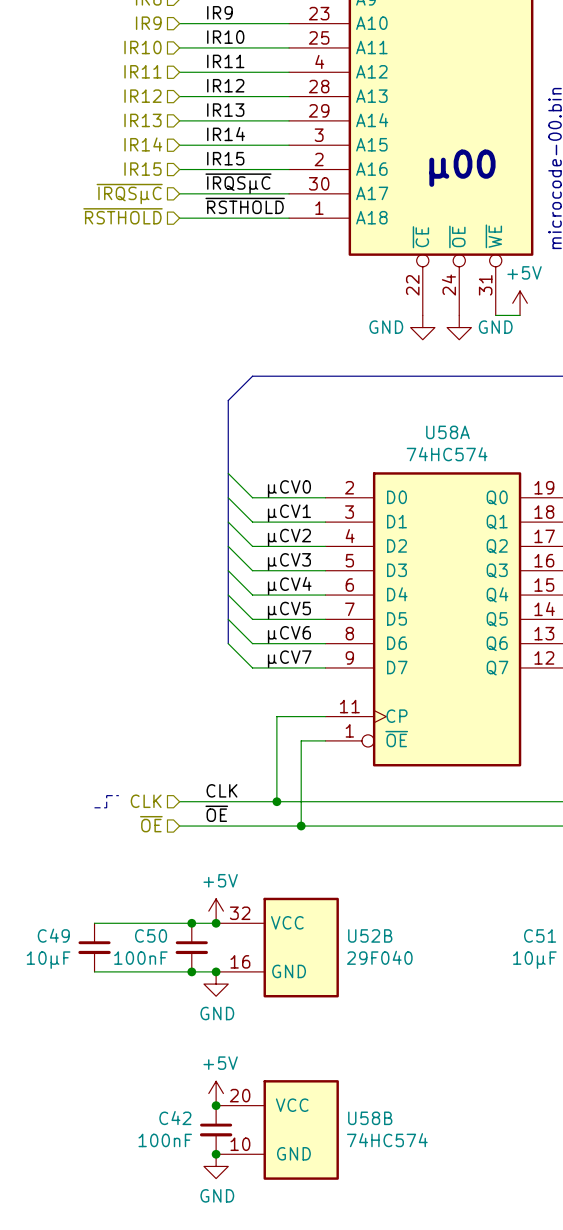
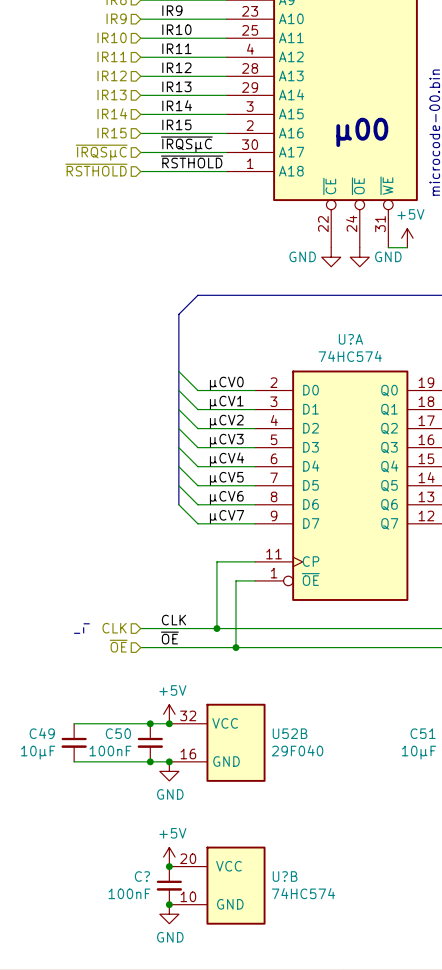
U58A name: U58A (447, 432) -> U?A (350, 339)
C42 name: C42 (175, 1118) -> C? (142, 876)
U58B name: U58B (370, 1118) -> U?B (285, 876)

